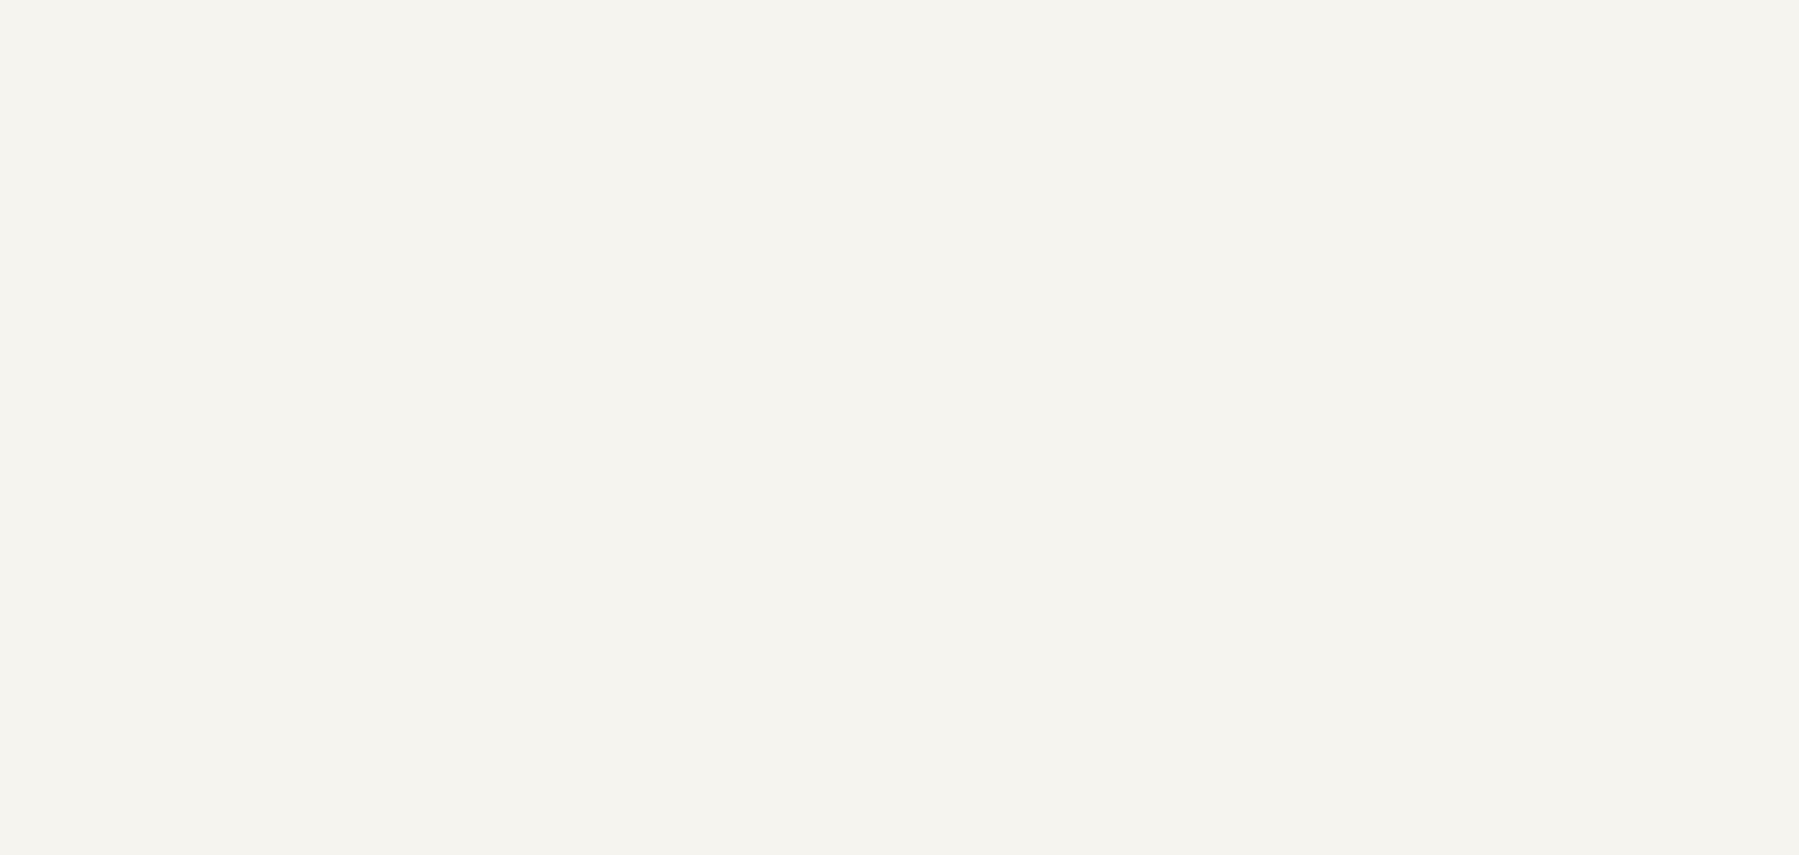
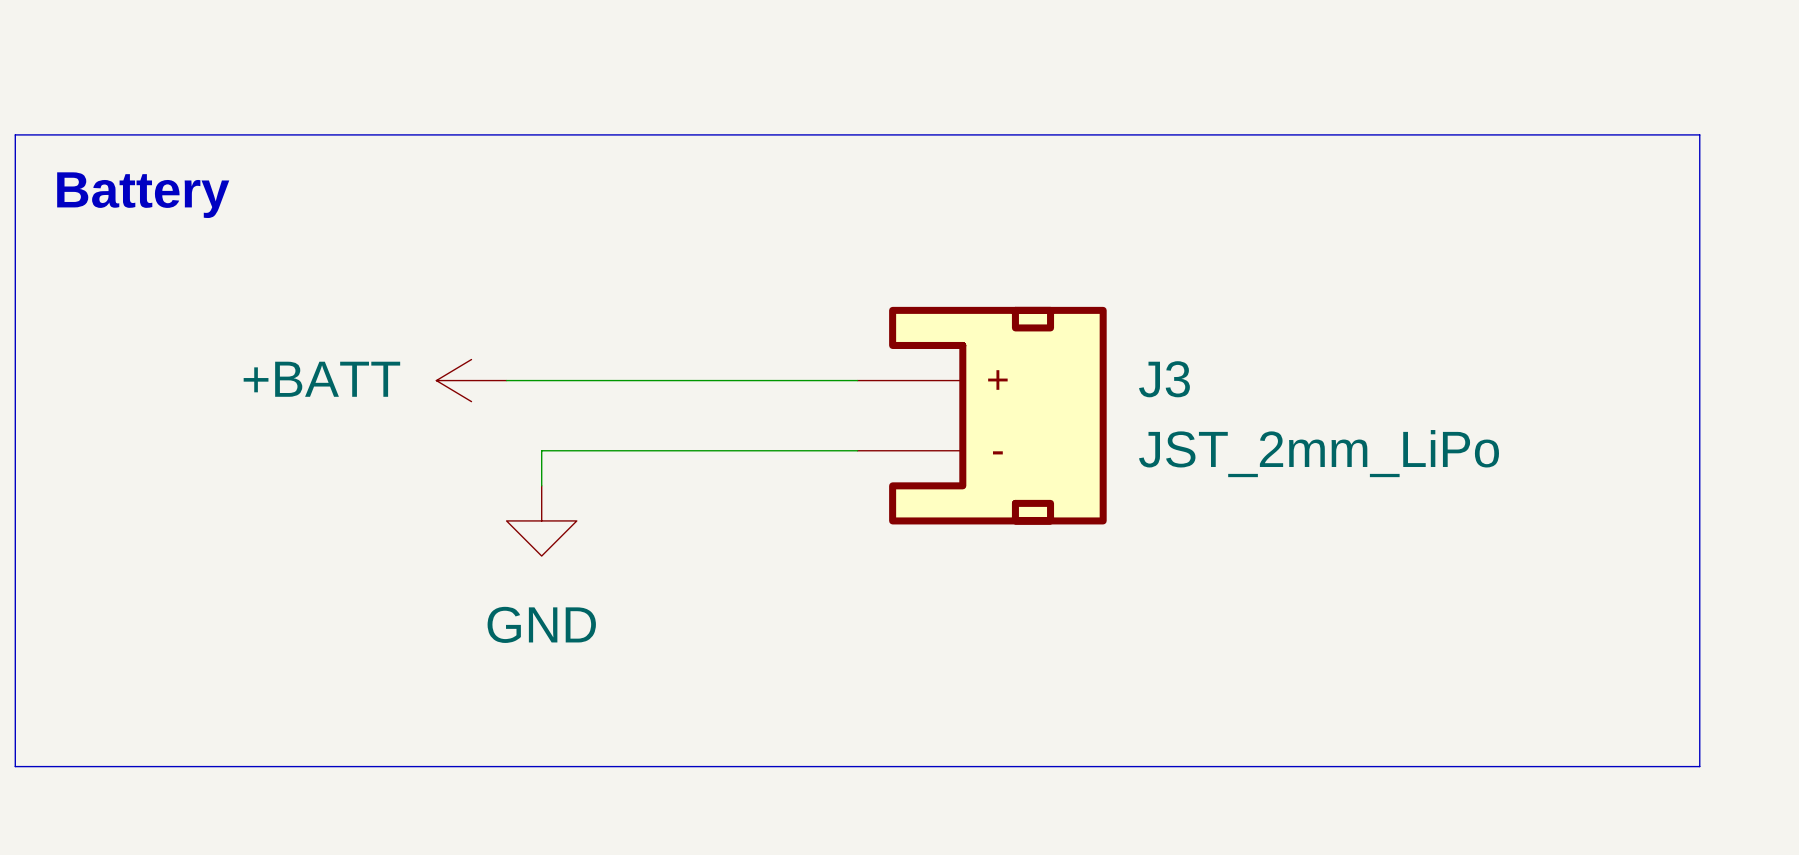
line: none -> (15, 134) (1699, 134) (1699, 766) (15, 766) (15, 134)
text: none -> Battery (143, 195)
power symbol: none -> +BATT (471, 380)
wire: none -> (506, 380) (857, 380)
J3: none -> JST_2mm_LiPo (982, 415)
wire: none -> (857, 450) (541, 450) (541, 485)
power symbol: none -> GND (541, 520)

